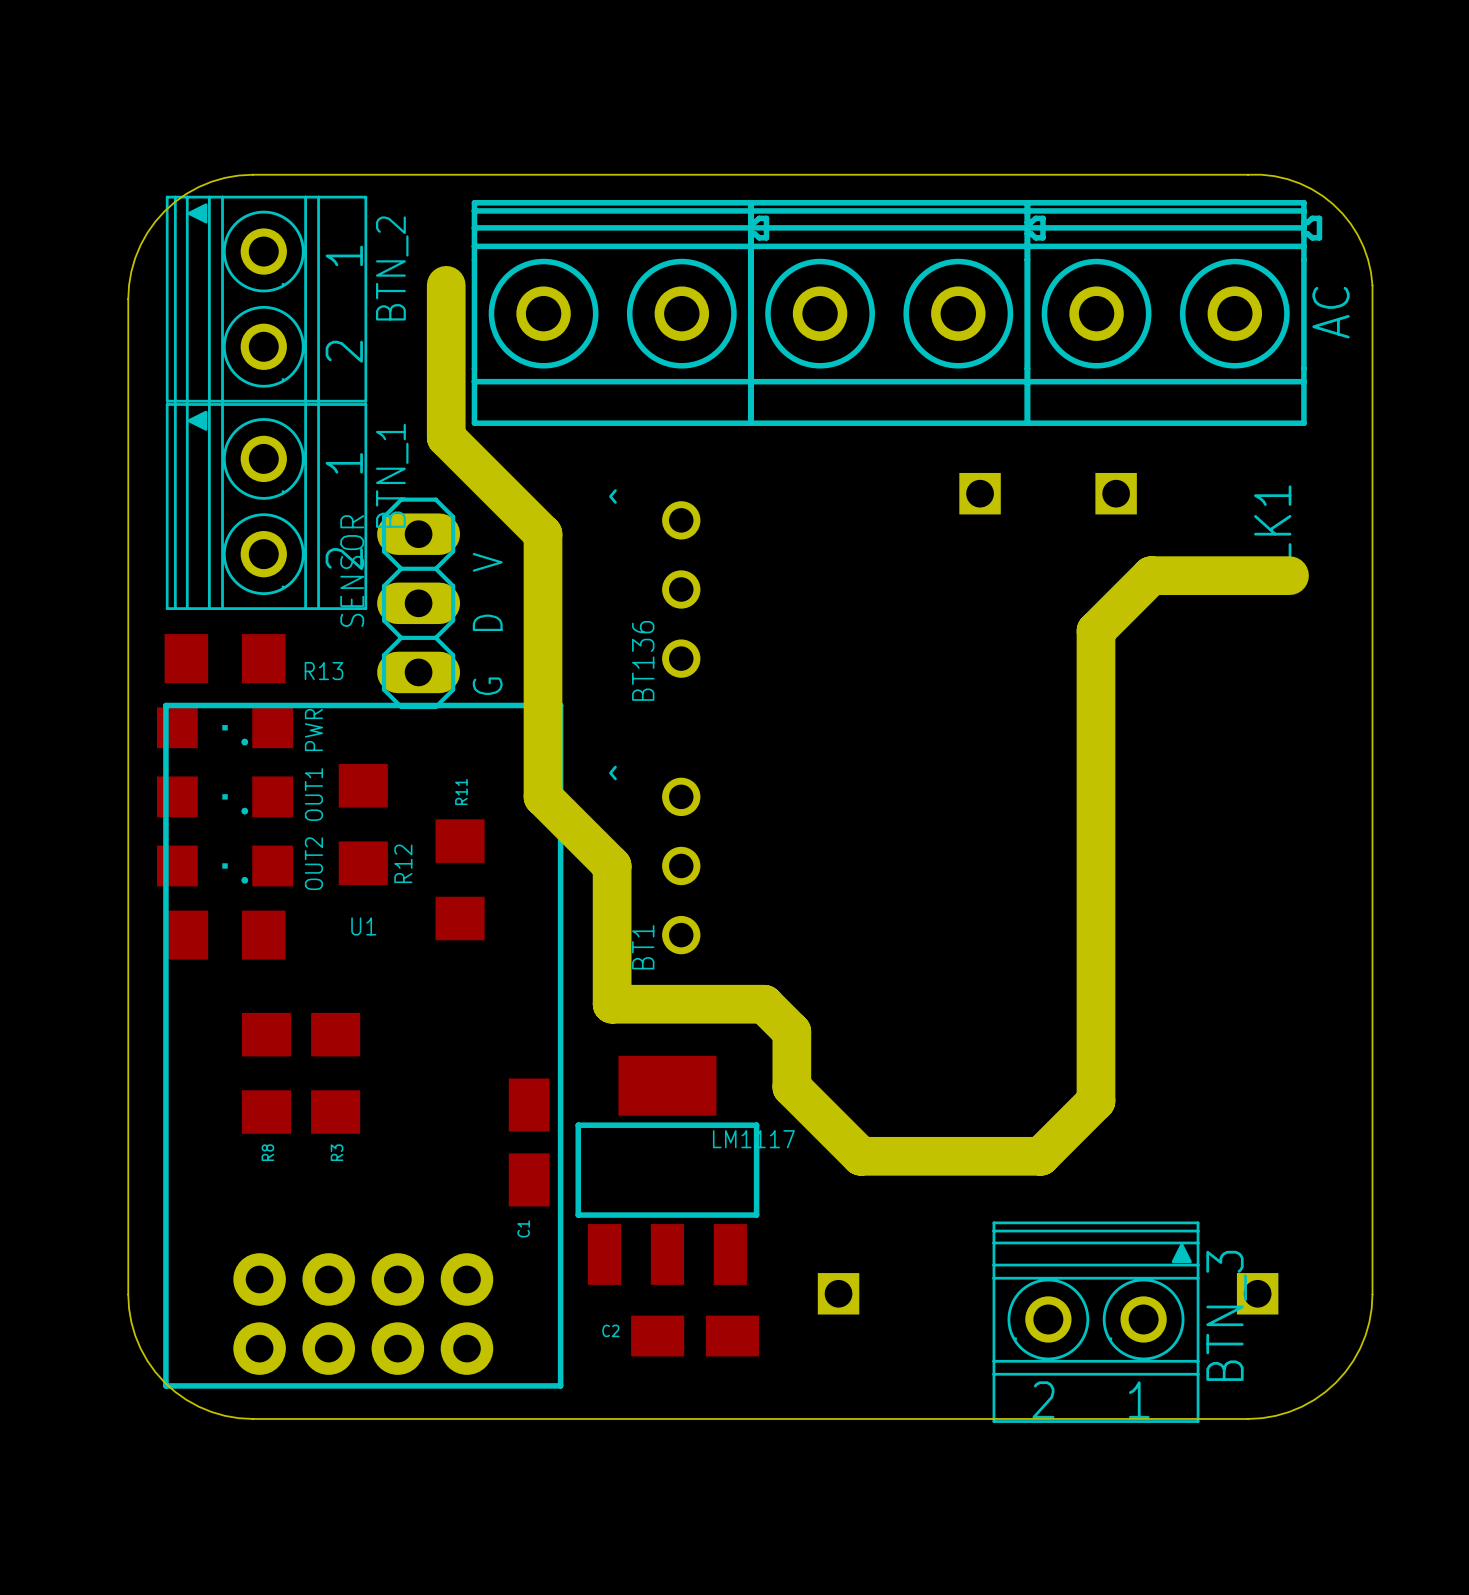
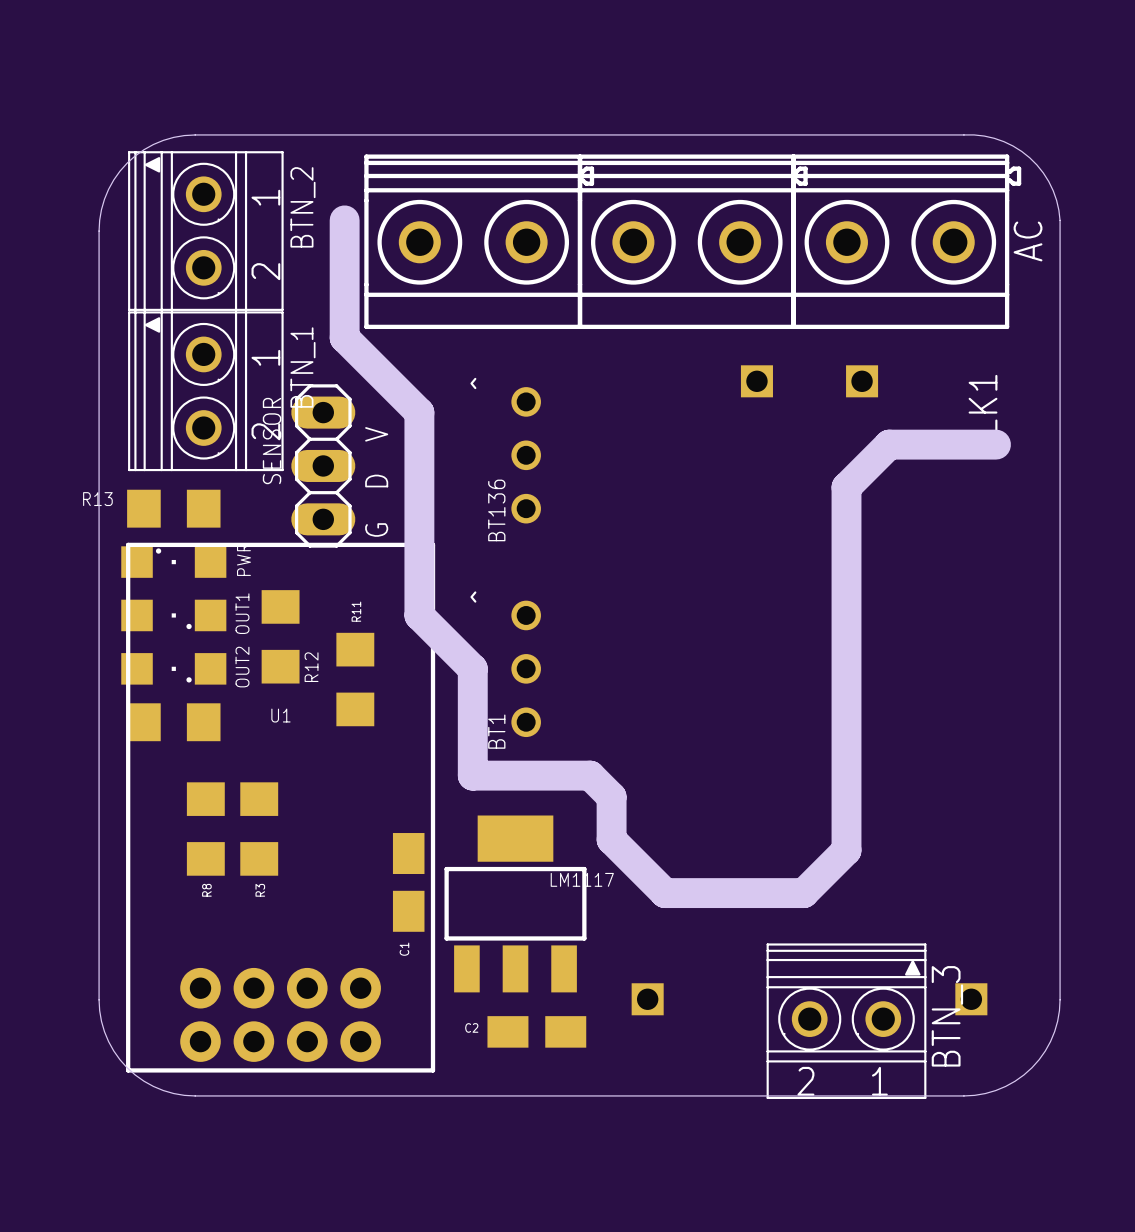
R13 name position: R13 (323, 671) -> R13 (97, 499)
PWR rotation: 0° (225, 727) -> 180° (173, 562)

